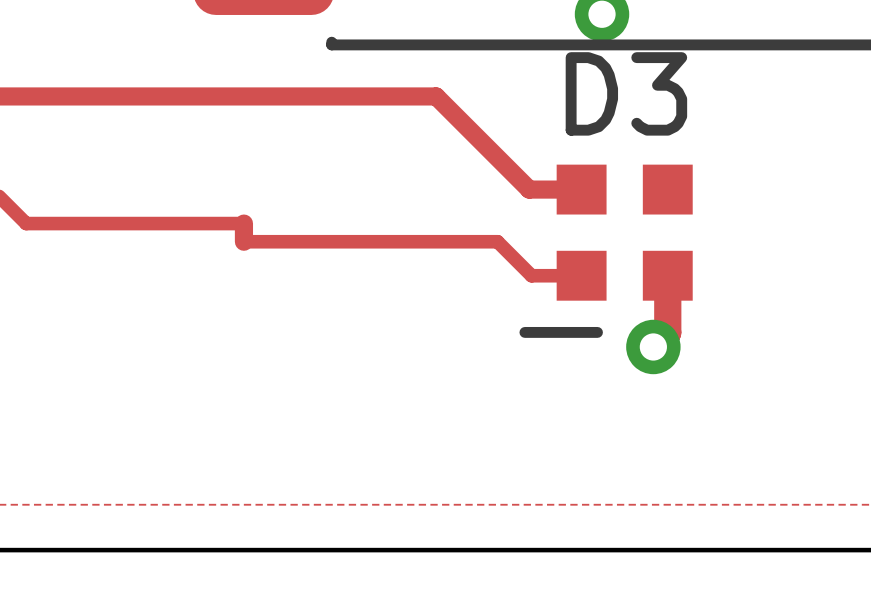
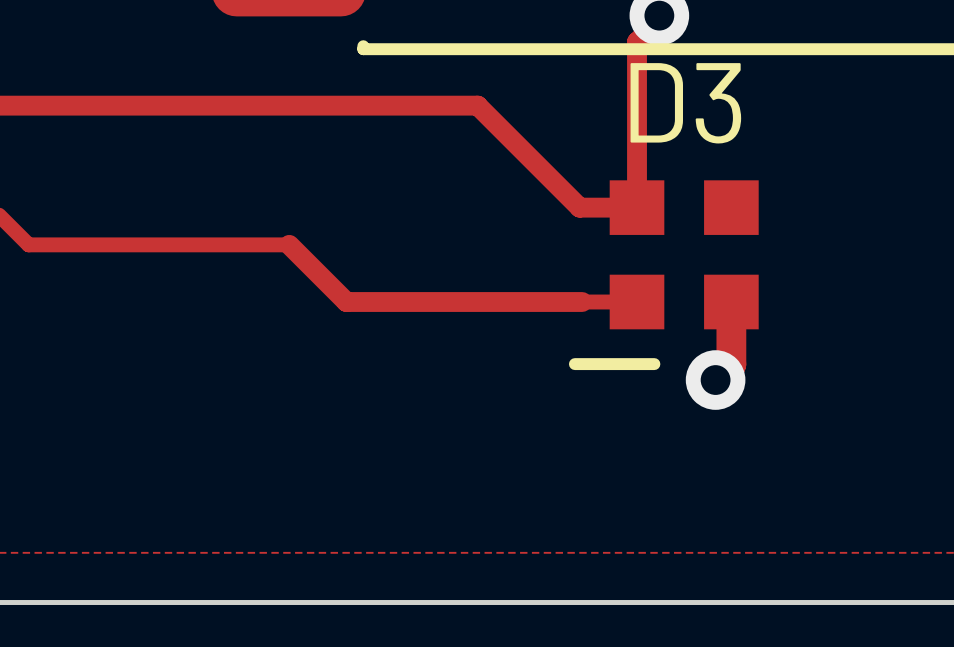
track: none -> (664, 14) (637, 41) (637, 207)
track: (243, 223) (243, 241) (497, 241) (531, 275) -> (267, 244) (289, 244) (346, 302) (582, 302)

